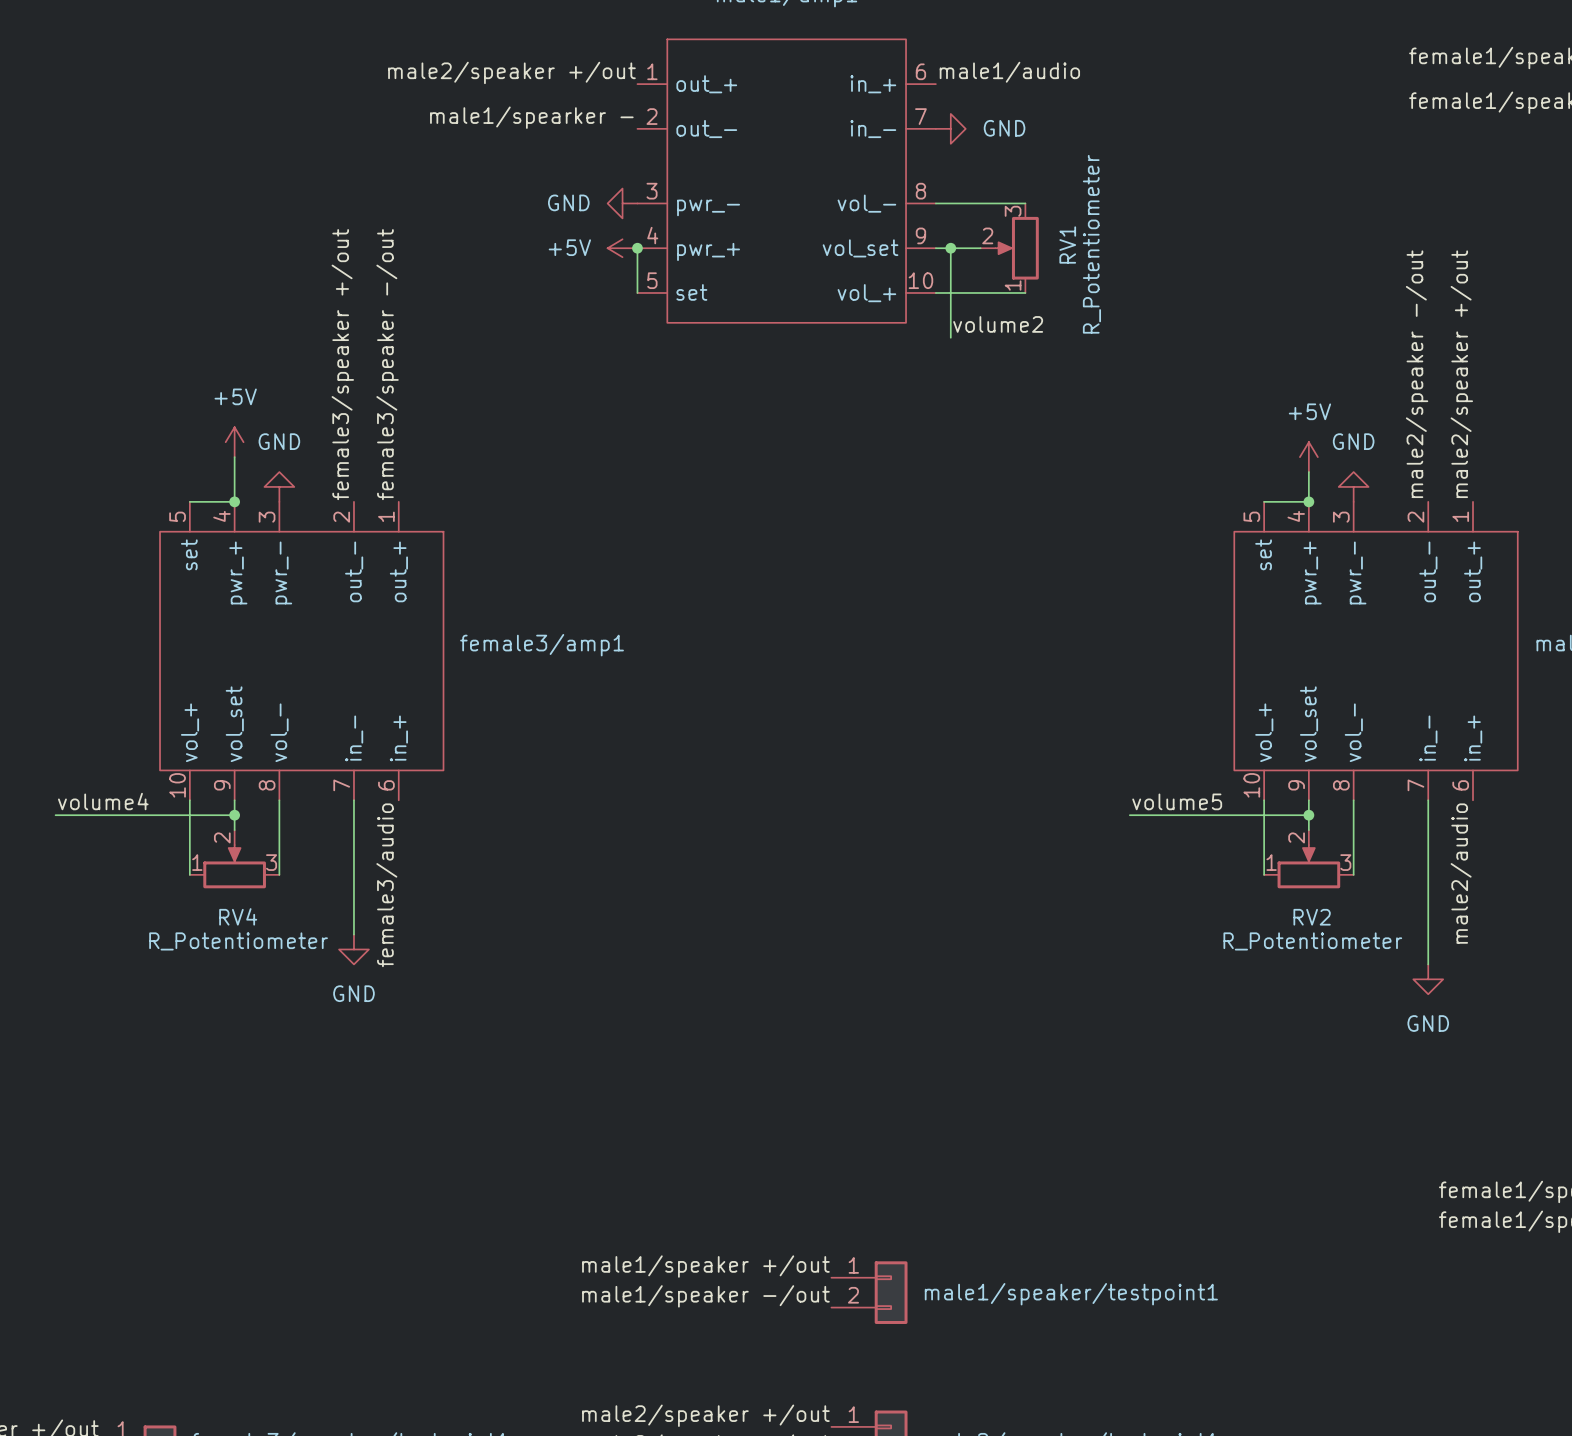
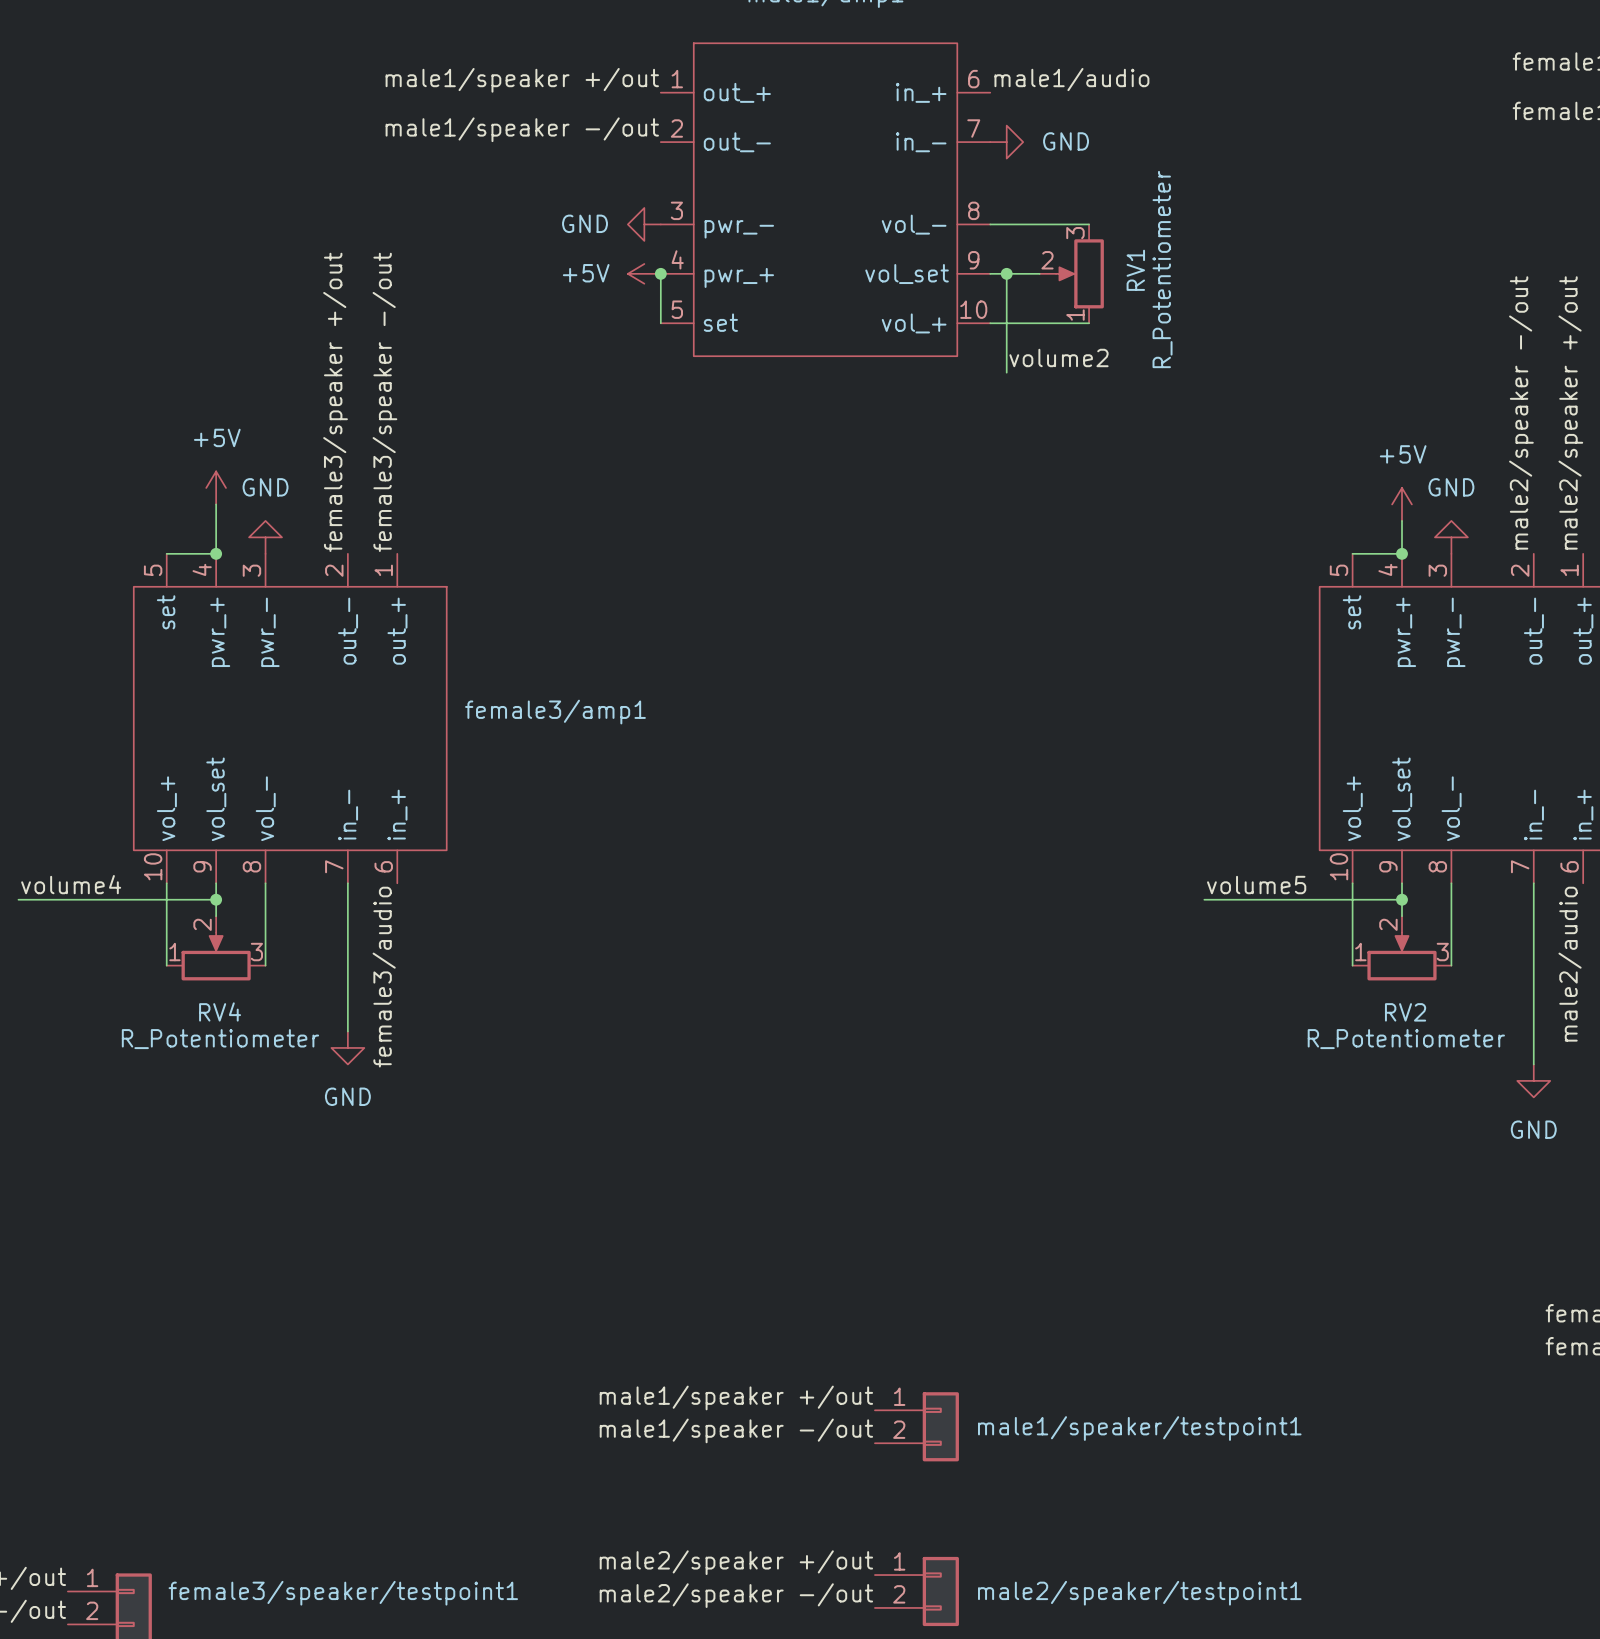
label: male2/speaker +/out (511, 72) -> male1/speaker +/out (522, 80)
label: male1/spearker - (531, 117) -> male1/speaker -/out (522, 129)

